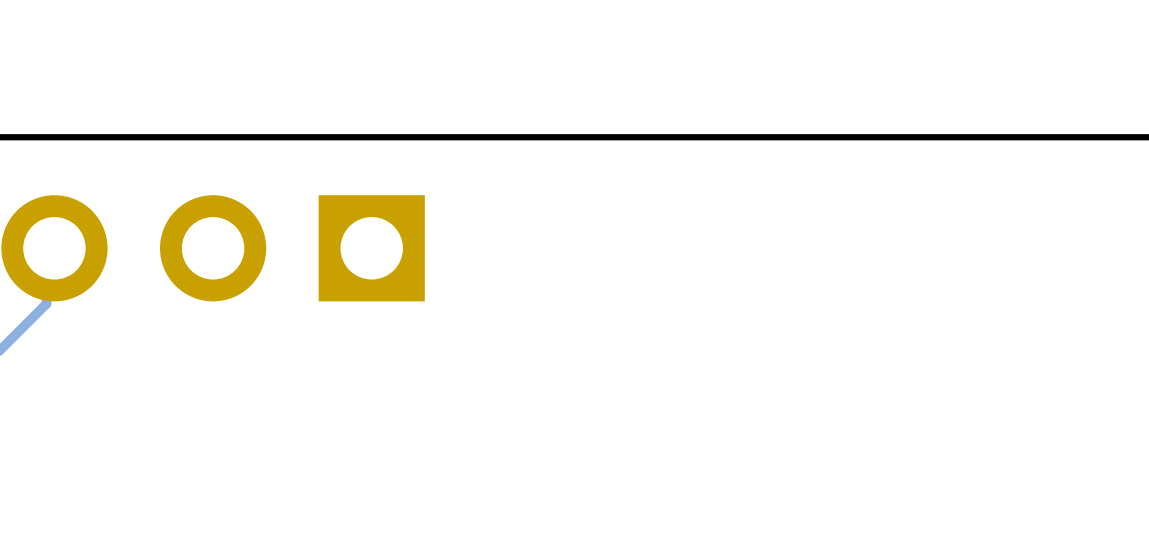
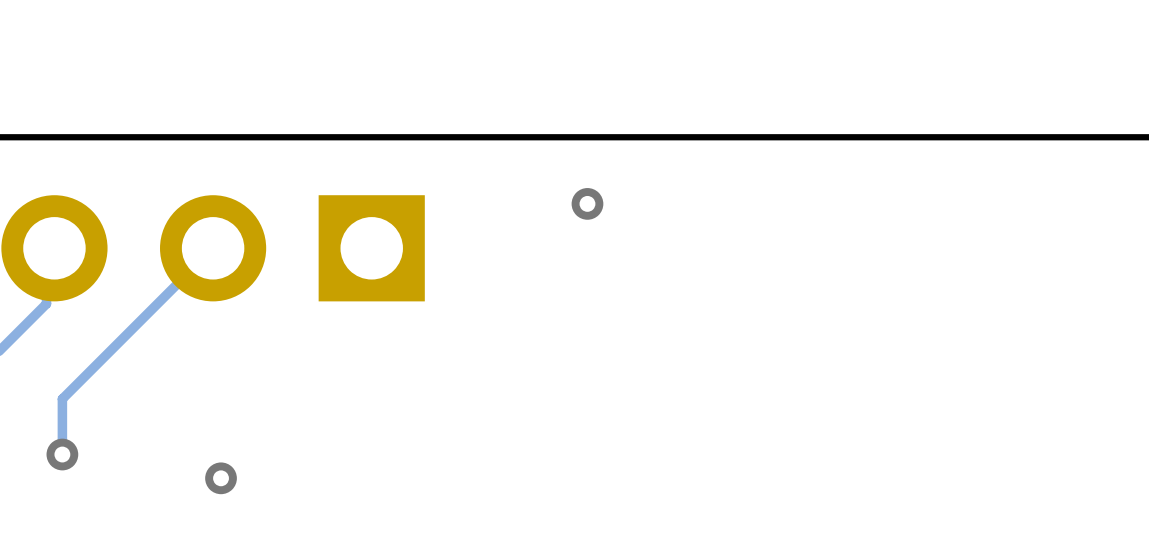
via: none -> (587, 203)
track: none -> (213, 248) (62, 399) (62, 454)
via: none -> (62, 454)
via: none -> (221, 478)

